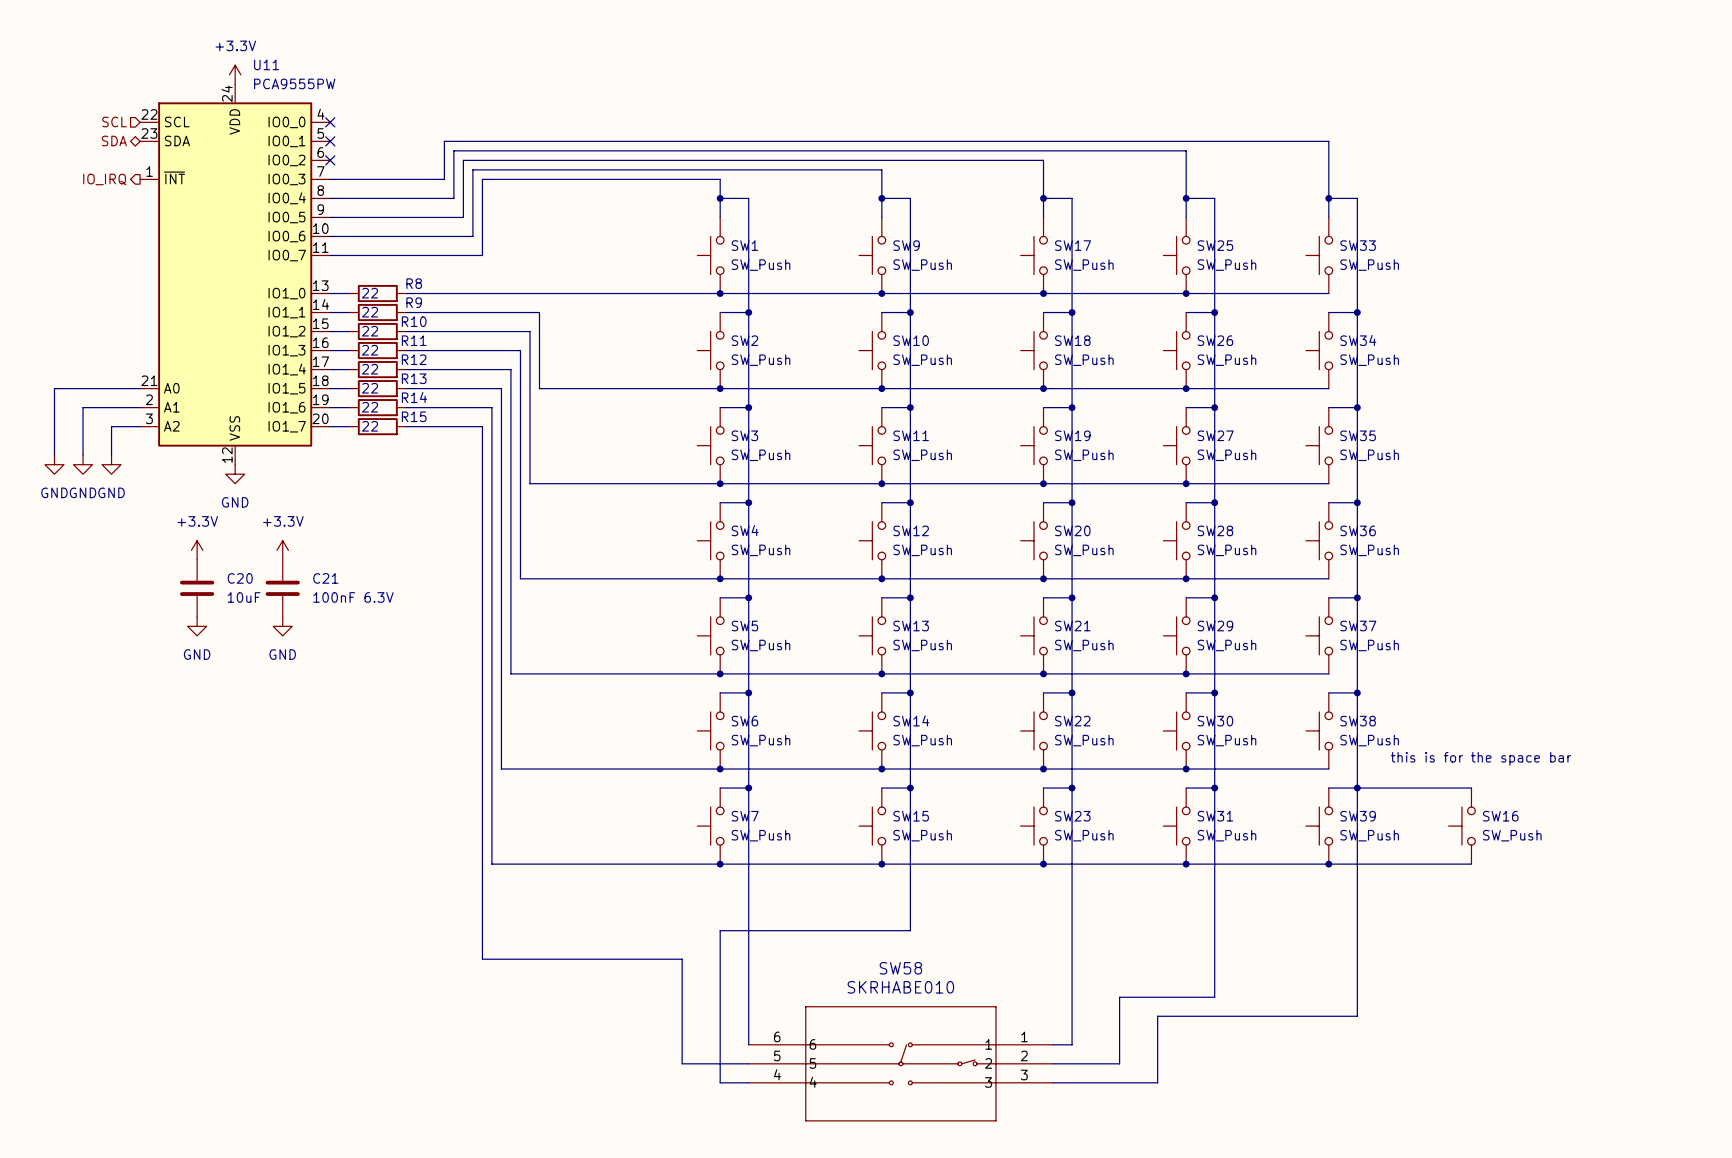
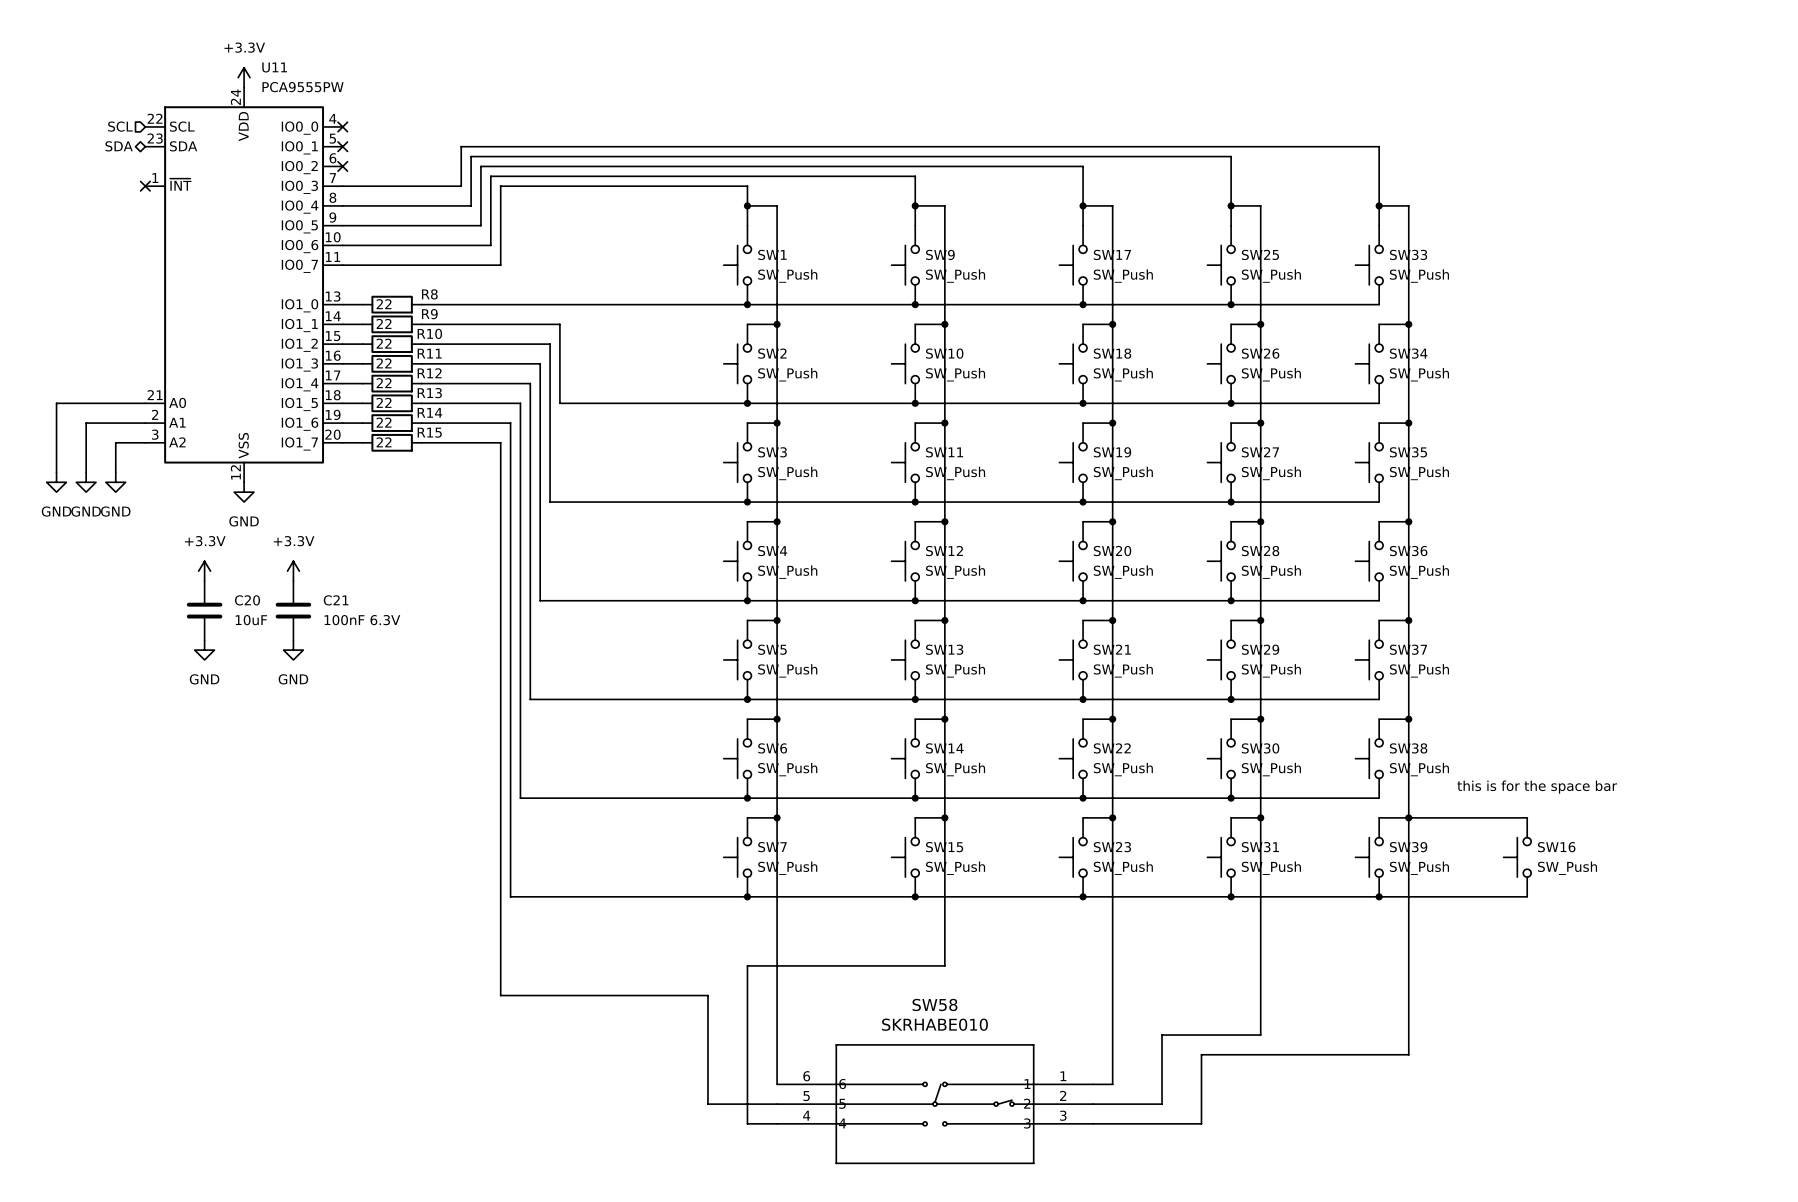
hierarchical label: IO_IRQ (104, 179) -> none
no-connect mark: none -> (145, 186)

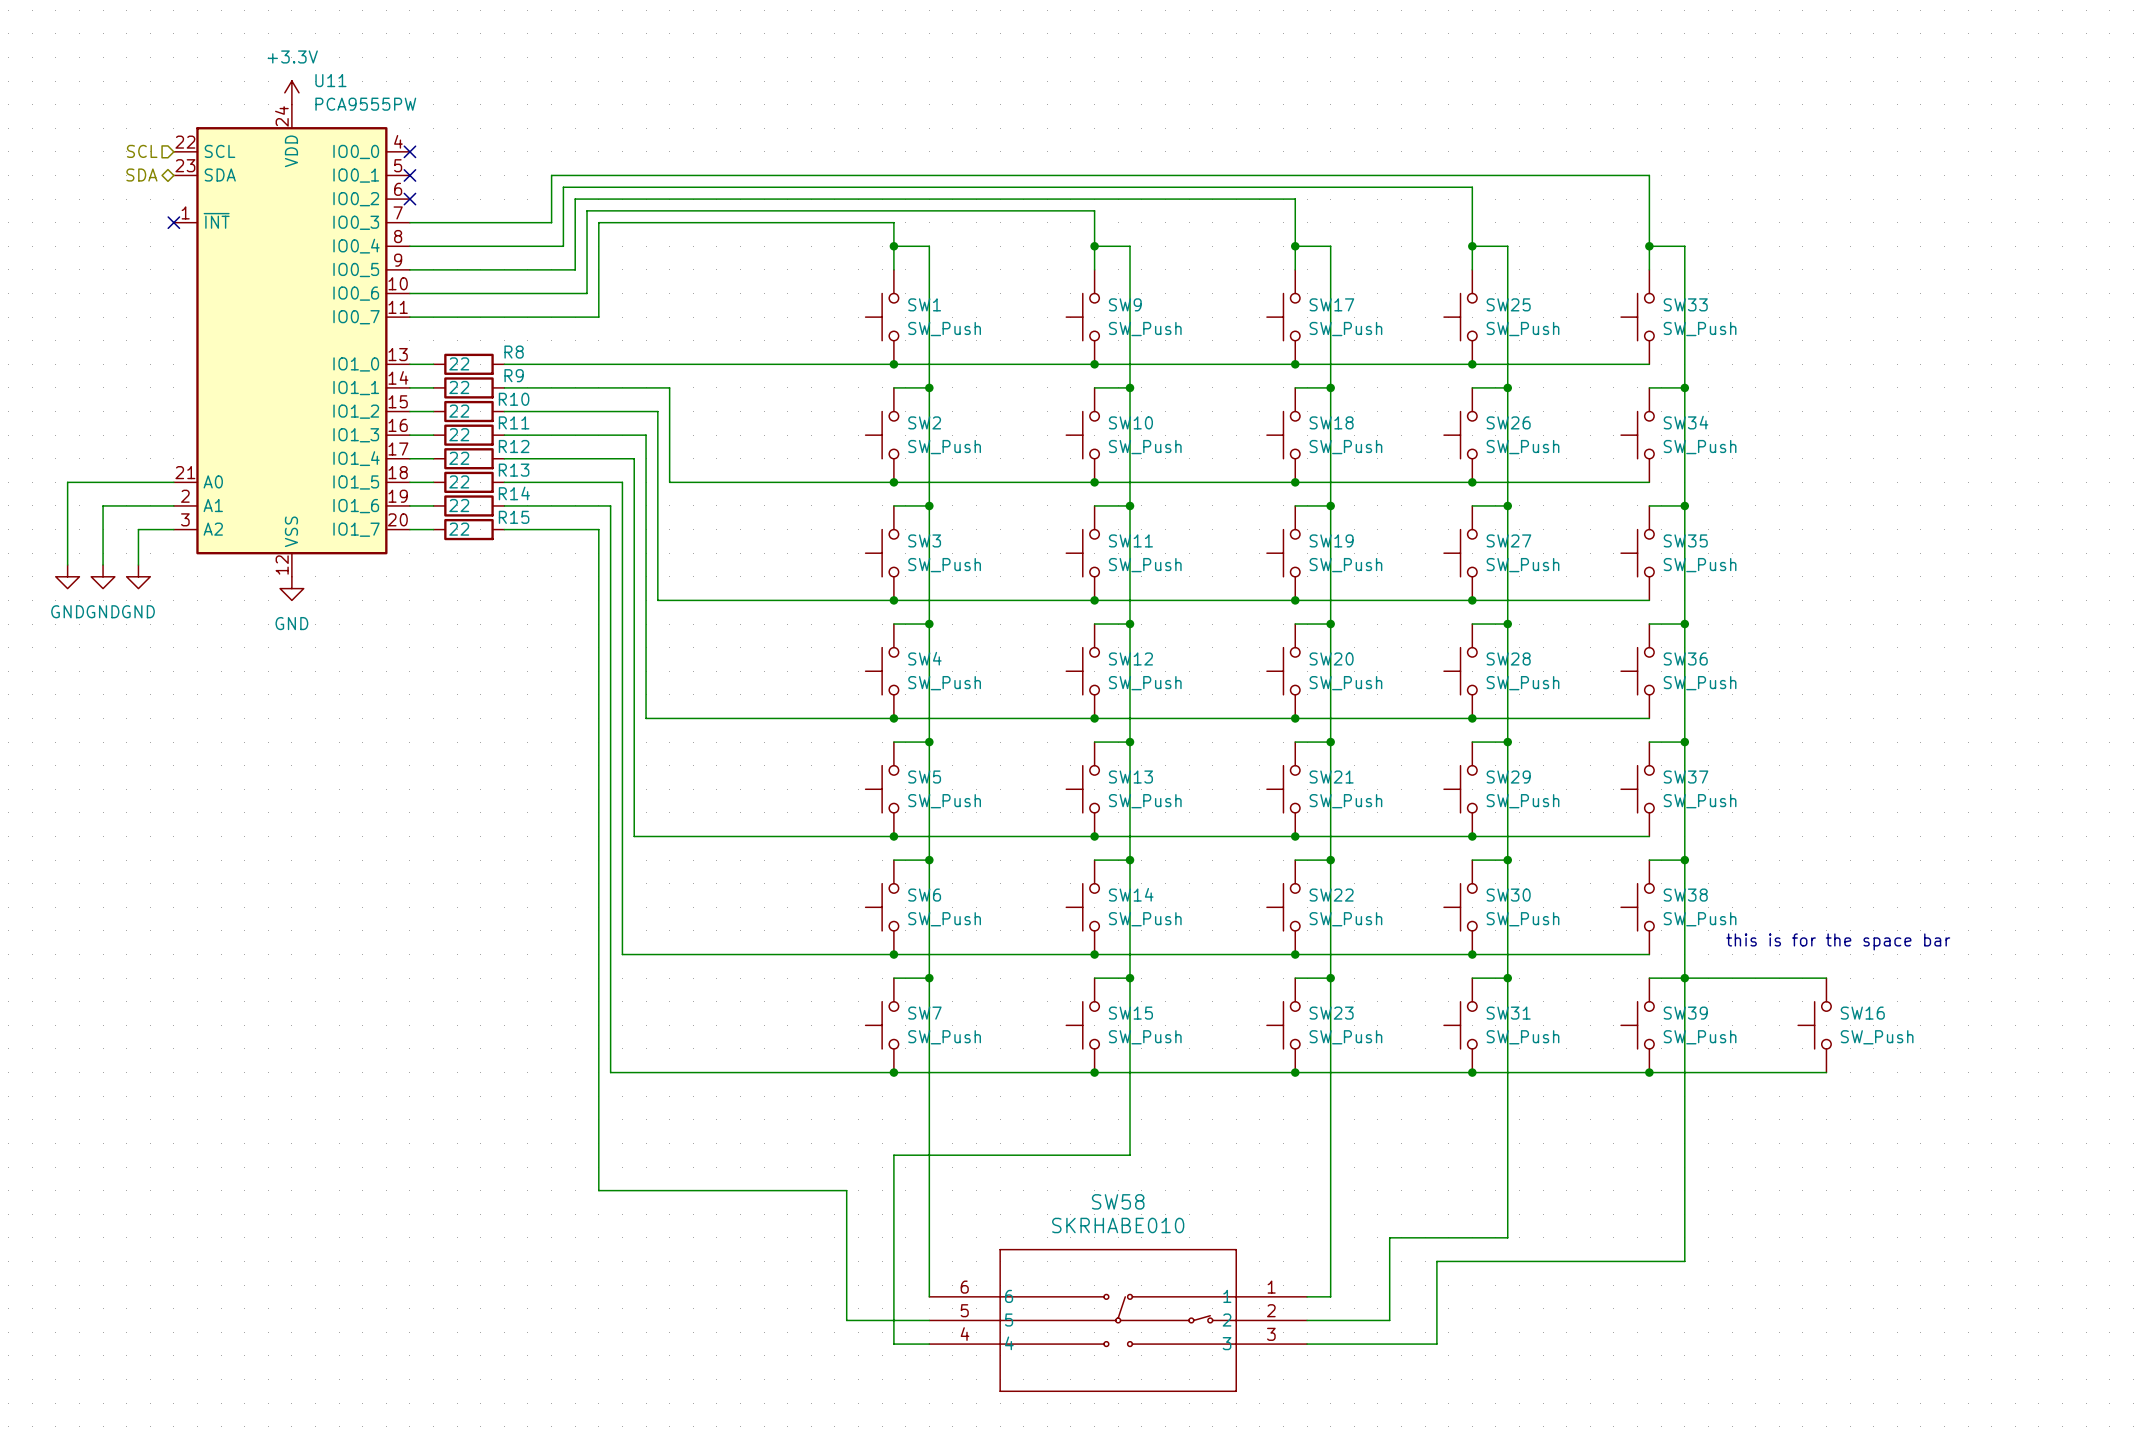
power symbol: +3.3V (204, 571) -> none
power symbol: +3.3V (293, 571) -> none
C20: 10uF (204, 610) -> none
C21: 100nF 6.3V (293, 610) -> none
power symbol: GND (204, 650) -> none
power symbol: GND (293, 650) -> none

